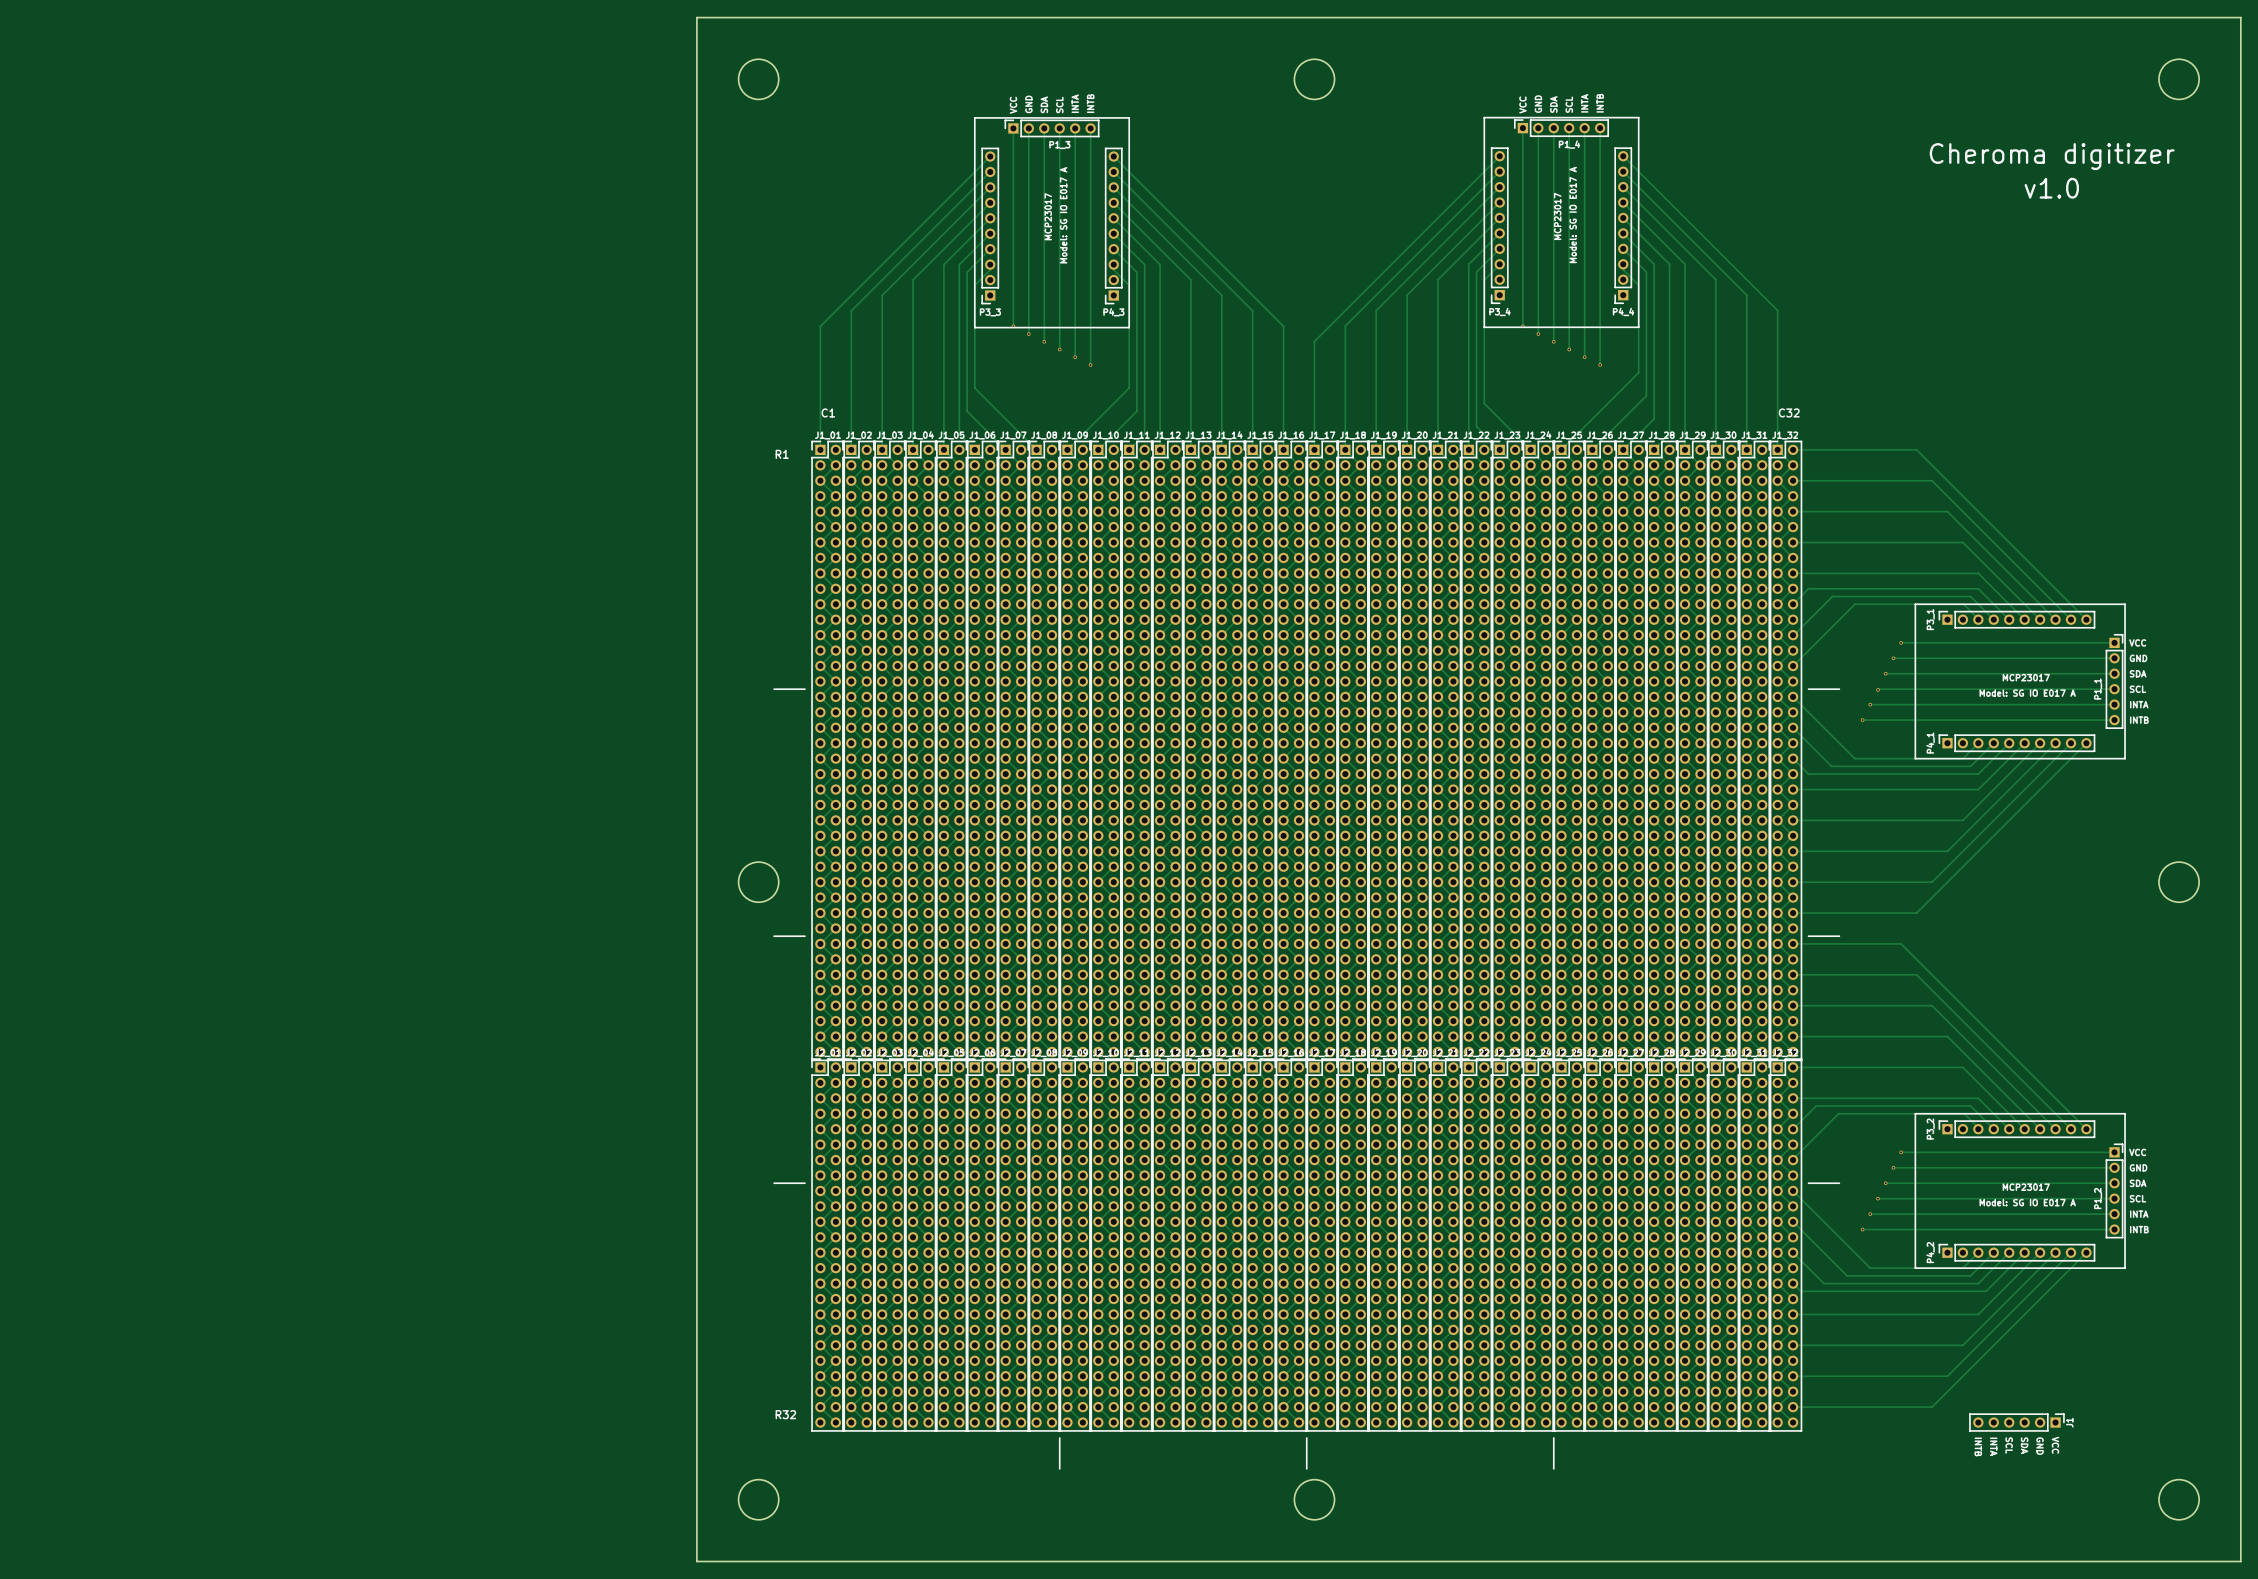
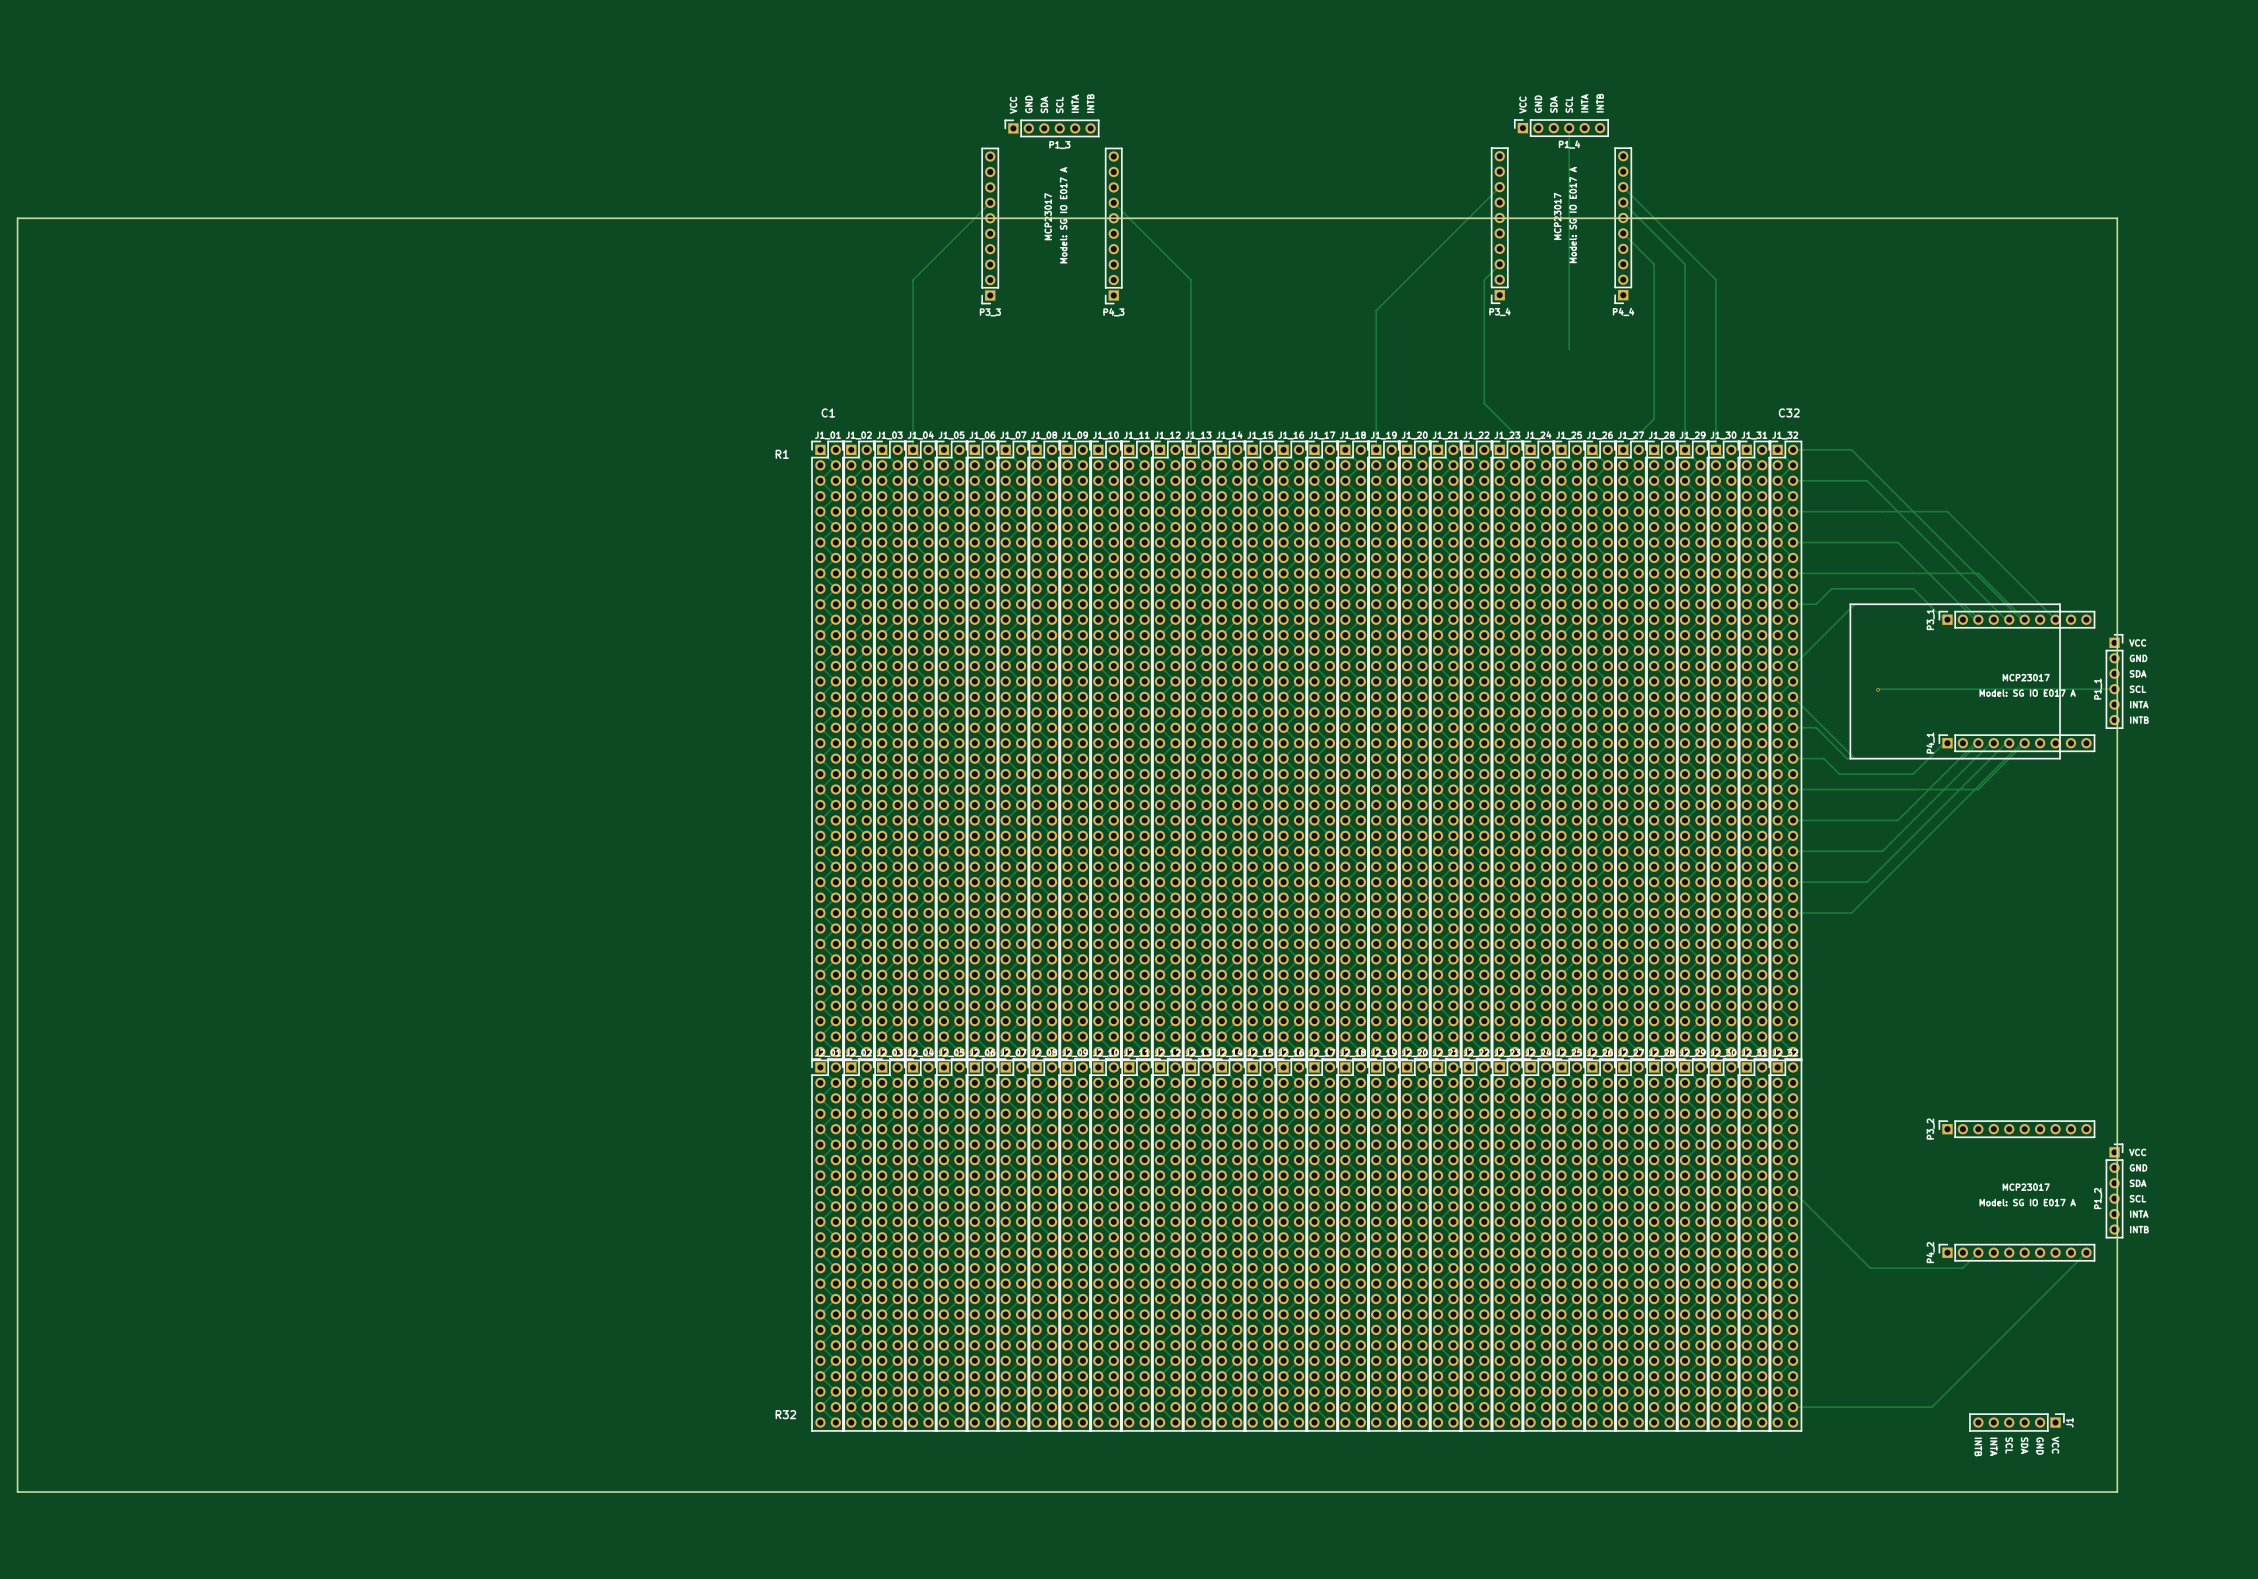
board edge: (696, 17) (2240, 17) (2240, 1561) (696, 1561) (696, 17) -> (17, 218) (17, 1492) (2117, 1492) (2117, 218) (17, 218)
round board edge: [738, 58, 780, 100] -> none
round board edge: [1294, 58, 1335, 100] -> none
round board edge: [2158, 58, 2200, 100] -> none
line: (974, 117) (1129, 117) (1129, 327) (974, 327) (974, 117) -> none
line: (1484, 117) (1638, 117) (1638, 327) (1484, 327) (1484, 117) -> none
track: (1013, 128) (1013, 326) -> none
track: (1028, 128) (1028, 334) -> none
track: (1044, 128) (1044, 341) -> none
track: (1059, 128) (1059, 349) -> none
track: (1075, 128) (1075, 357) -> none
track: (1090, 128) (1090, 364) -> none
track: (1522, 128) (1522, 326) -> none
track: (1538, 128) (1538, 334) -> none
track: (1553, 128) (1553, 341) -> none
track: (1584, 128) (1584, 357) -> none
track: (1600, 128) (1600, 364) -> none
track: (990, 156) (820, 326) (820, 449) -> none
track: (1113, 156) (1283, 326) (1283, 449) -> none
track: (1499, 156) (1314, 341) (1314, 449) -> none
track: (1623, 156) (1777, 310) (1777, 449) -> none
text: Cheroma digitizer (2052, 156) -> none
track: (990, 171) (851, 310) (851, 449) -> none
track: (1113, 171) (1252, 310) (1252, 449) -> none
track: (1499, 171) (1345, 326) (1345, 449) -> none
track: (1623, 171) (1746, 295) (1746, 449) -> none
track: (990, 187) (882, 295) (882, 449) -> none
track: (1113, 187) (1221, 295) (1221, 449) -> none
text: v1.0 (2051, 188) -> none
track: (1499, 202) (1407, 295) (1407, 449) -> none
track: (1499, 217) (1437, 279) (1437, 449) -> none
track: (1623, 217) (1669, 264) (1669, 434) (1654, 449) -> none
track: (990, 218) (943, 264) (943, 449) -> none
track: (1113, 218) (1160, 264) (1160, 449) -> none
track: (990, 233) (959, 264) (959, 434) (974, 449) -> none
track: (1113, 233) (1144, 264) (1144, 434) (1129, 449) -> none
track: (1499, 233) (1468, 264) (1468, 449) -> none
track: (1499, 248) (1476, 272) (1476, 426) (1499, 449) -> none
track: (1623, 248) (1646, 272) (1646, 395) (1592, 449) -> none
track: (990, 249) (967, 272) (967, 411) (1005, 449) -> none
track: (1113, 249) (1136, 272) (1136, 411) (1098, 449) -> none
track: (990, 264) (990, 269) (974, 285) (974, 388) (1036, 449) -> none
track: (1113, 264) (1113, 269) (1129, 285) (1129, 388) (1067, 449) -> none
track: (1623, 264) (1623, 269) (1638, 285) (1638, 372) (1561, 449) -> none
via: (1013, 326) -> none
via: (1522, 326) -> none
via: (1028, 334) -> none
via: (1538, 334) -> none
via: (1044, 341) -> none
via: (1553, 341) -> none
via: (1059, 349) -> none
via: (1569, 349) -> none
via: (1075, 357) -> none
via: (1584, 357) -> none
via: (1090, 364) -> none
via: (1600, 364) -> none
track: (1851, 449) (1916, 449) (2086, 619) -> (1851, 449) (2021, 619)
track: (1867, 480) (1932, 480) (2070, 619) -> (1867, 480) (2005, 619)
track: (1897, 542) (1962, 542) (2040, 619) -> (1897, 542) (1975, 619)
track: (1831, 588) (1808, 588) (1793, 604) -> (1831, 588) (1816, 604) (1793, 604)
track: (1913, 588) (1978, 588) (2009, 619) -> (1913, 588) (1944, 619)
line: (1915, 604) (1915, 758) -> (1915, 604) (1850, 604) (1850, 758) (1915, 758)
line: (2060, 604) (2125, 604) (2125, 758) (2060, 758) -> (2060, 604) (2060, 758)
track: (1993, 619) (1970, 596) (1832, 596) (1793, 635) -> none
track: (1901, 642) (2114, 642) -> none
via: (1901, 642) -> none
track: (1893, 658) (2114, 658) -> none
via: (1893, 658) -> none
track: (1885, 673) (2114, 673) -> none
via: (1885, 673) -> none
line: (774, 689) (804, 689) -> none
line: (1808, 689) (1839, 689) -> none
track: (1870, 704) (2114, 704) -> none
via: (1870, 704) -> none
track: (1862, 720) (2114, 720) -> none
via: (1862, 720) -> none
track: (1793, 727) (1823, 758) -> (1793, 727) (1816, 727) (1847, 758) (1854, 758)
track: (1993, 743) (1970, 766) (1831, 766) -> (1839, 774) (1831, 766)
track: (2009, 743) (1978, 774) (1913, 774) -> (1944, 743) (1913, 774)
track: (2040, 743) (1962, 820) (1897, 820) -> (1975, 743) (1897, 820)
track: (2055, 743) (1947, 851) (1882, 851) -> (1990, 743) (1882, 851)
track: (2070, 743) (1932, 882) (1867, 882) -> (2005, 743) (1867, 882)
track: (2086, 743) (1916, 913) (1851, 913) -> (2021, 743) (1851, 913)
track: (1793, 758) (1808, 774) (1839, 774) -> (1793, 758) (1823, 758)
round board edge: [738, 861, 780, 903] -> none
round board edge: [2158, 861, 2200, 903] -> none
line: (774, 936) (804, 936) -> none
line: (1808, 936) (1839, 936) -> none
track: (1793, 943) (1901, 943) (2086, 1129) -> none
track: (1793, 974) (1916, 974) (2070, 1129) -> none
track: (1793, 1005) (1932, 1005) (2055, 1129) -> none
track: (1793, 1036) (1947, 1036) (2040, 1129) -> none
track: (1793, 1067) (1962, 1067) (2024, 1129) -> none
track: (1793, 1098) (1978, 1098) (2009, 1129) -> none
line: (1915, 1113) (1915, 1268) (2125, 1268) (2125, 1113) (1915, 1113) -> none
track: (1793, 1129) (1816, 1106) (1970, 1106) (1993, 1129) -> none
track: (1978, 1129) (1964, 1113) (1838, 1113) (1793, 1160) -> none
track: (1901, 1152) (2114, 1152) -> none
via: (1901, 1152) -> none
track: (1893, 1167) (2114, 1167) -> none
via: (1893, 1167) -> none
line: (774, 1183) (804, 1183) -> none
line: (1808, 1183) (1839, 1183) -> none
track: (1885, 1183) (2114, 1183) -> none
via: (1885, 1183) -> none
track: (1878, 1198) (2114, 1198) -> none
via: (1878, 1198) -> none
track: (1870, 1214) (2114, 1214) -> none
via: (1870, 1214) -> none
track: (1793, 1221) (1847, 1275) (1970, 1275) (1993, 1252) -> none
track: (1862, 1229) (2114, 1229) -> none
via: (1862, 1229) -> none
track: (1793, 1252) (1823, 1283) (1978, 1283) (2009, 1252) -> none
track: (2024, 1252) (1986, 1291) (1800, 1291) (1793, 1283) -> none
track: (2040, 1252) (1978, 1314) (1793, 1314) -> none
track: (2055, 1252) (1962, 1345) (1793, 1345) -> none
track: (2070, 1252) (1947, 1376) (1793, 1376) -> none
line: (1059, 1437) (1059, 1468) -> none
line: (1306, 1437) (1306, 1468) -> none
line: (1553, 1437) (1553, 1468) -> none
round board edge: [738, 1479, 780, 1521] -> none
round board edge: [1294, 1479, 1335, 1521] -> none
round board edge: [2158, 1479, 2200, 1521] -> none

